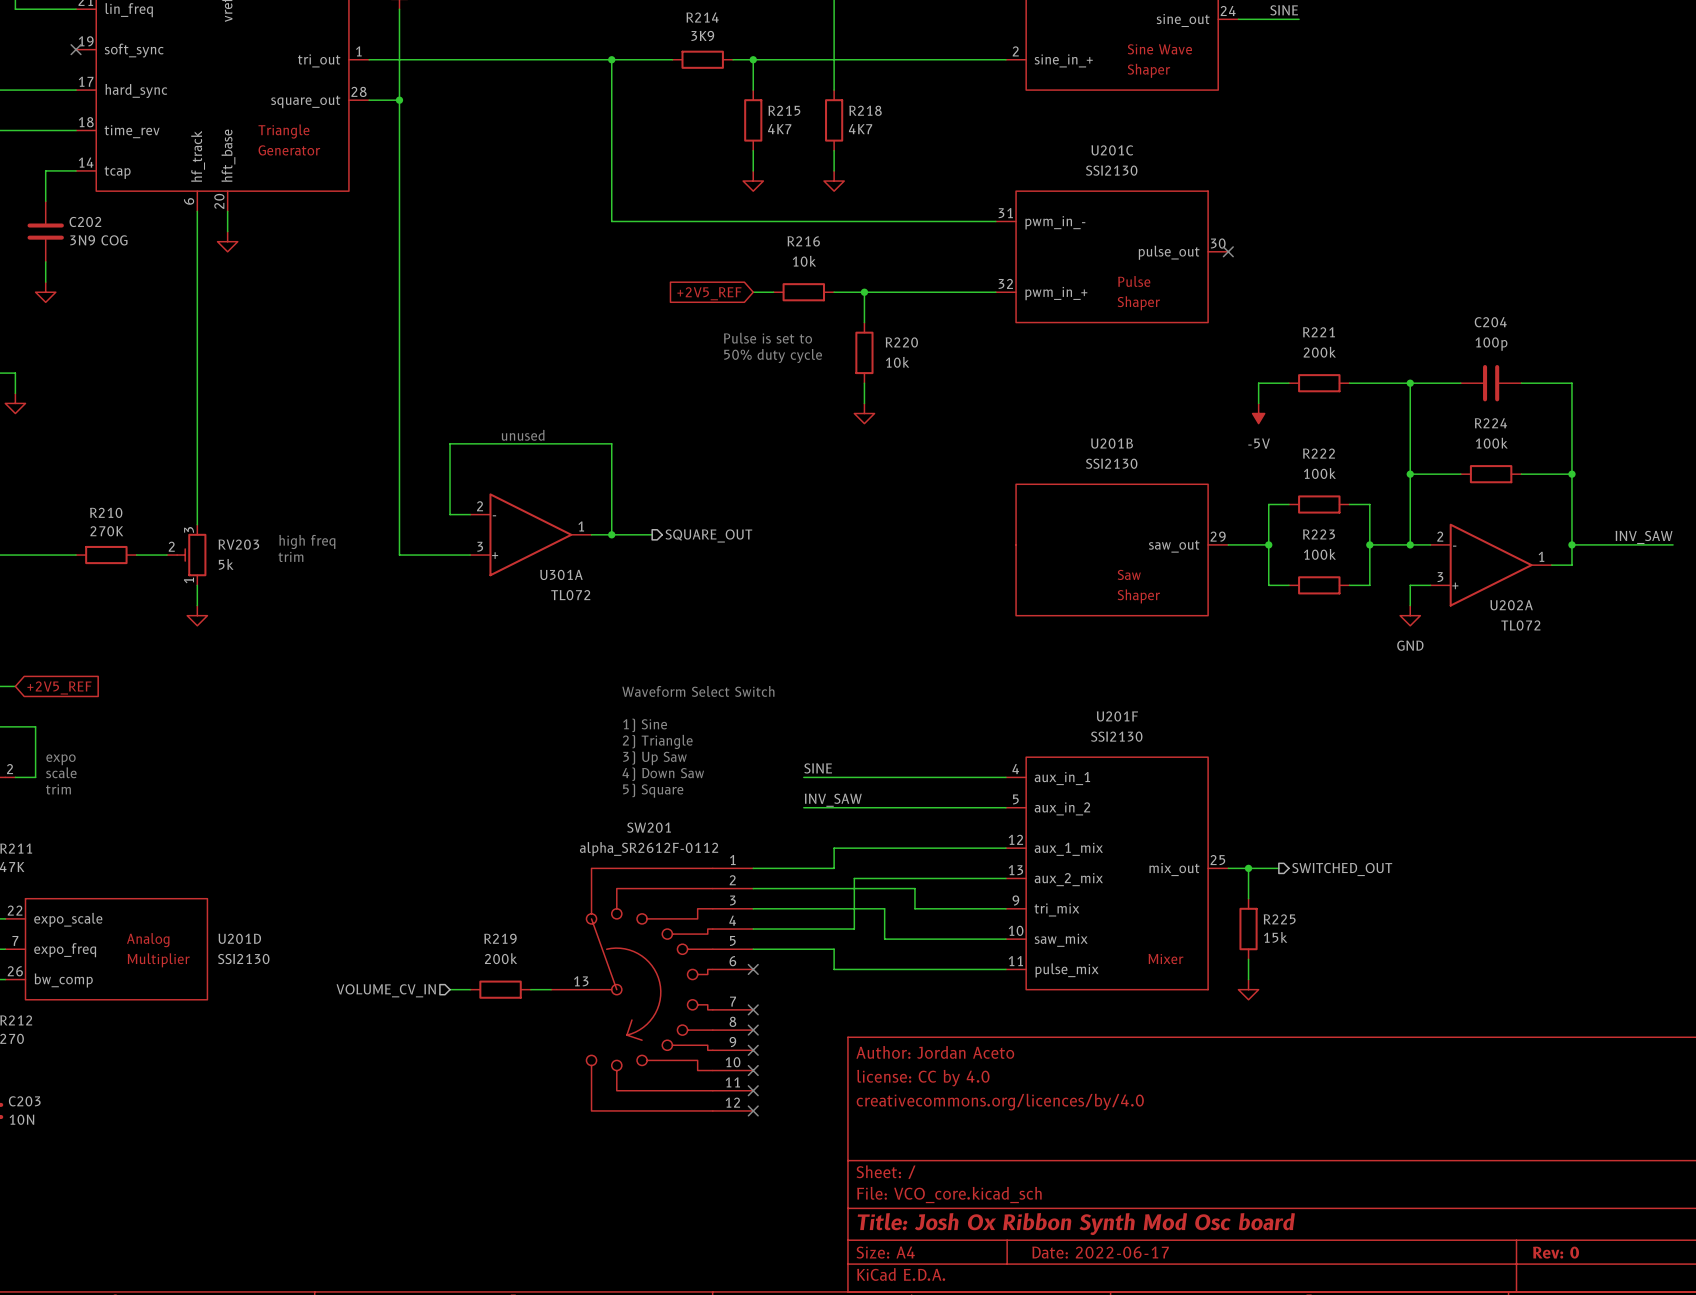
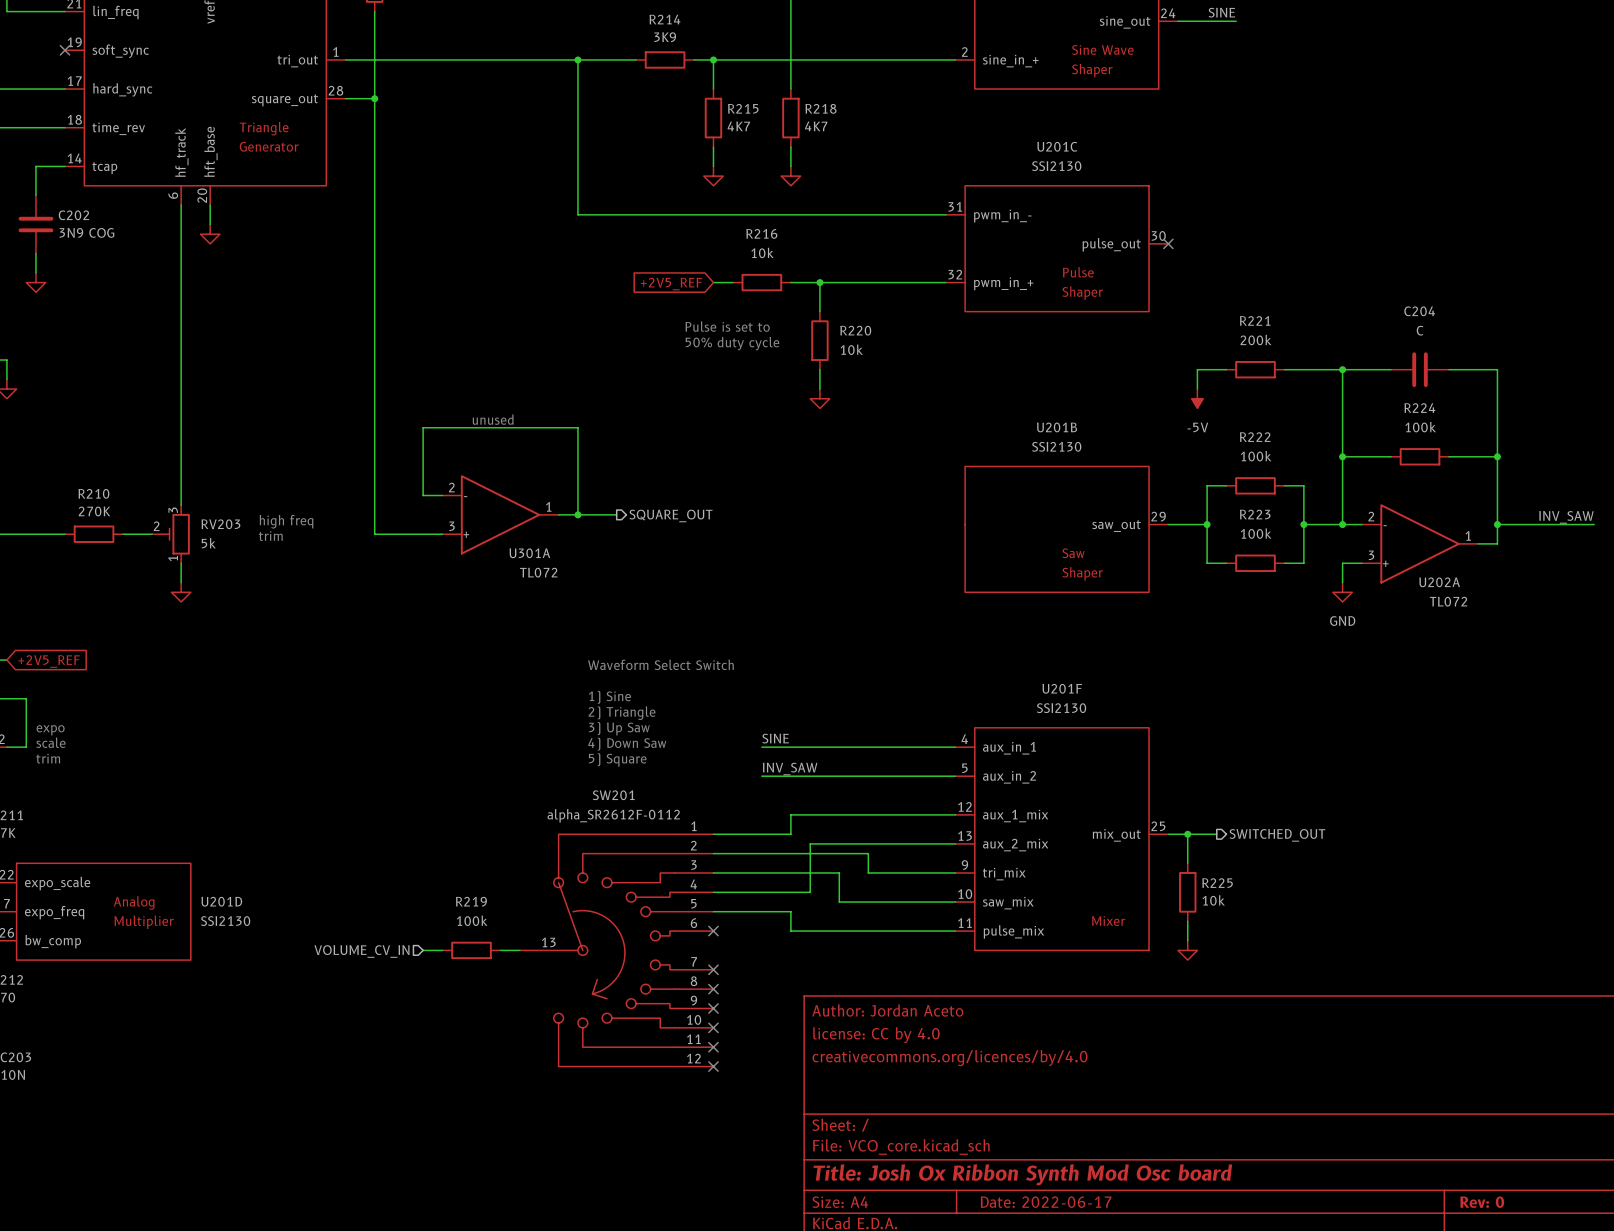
C204 value: 100p (1491, 344) -> C (1420, 330)
R225 value: 15k (1275, 937) -> 10k (1213, 900)
R219 value: 200k (501, 958) -> 100k (472, 920)

